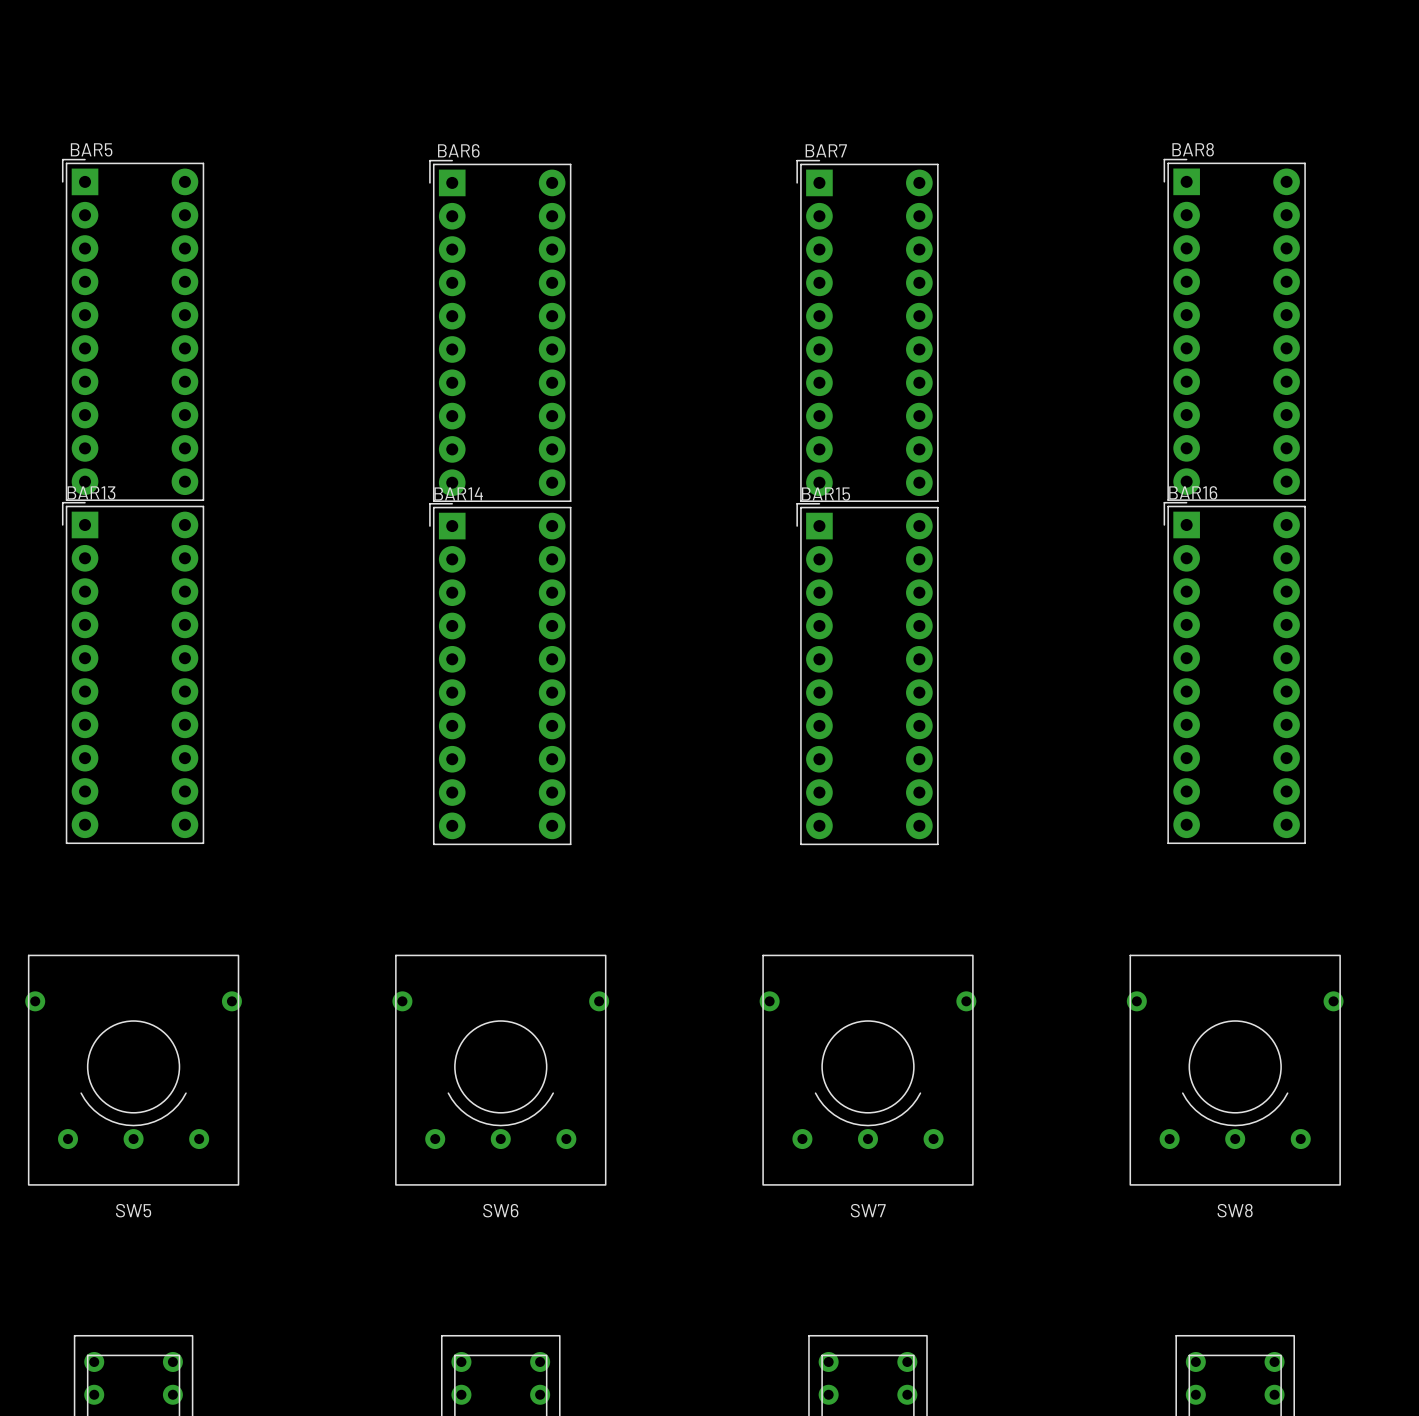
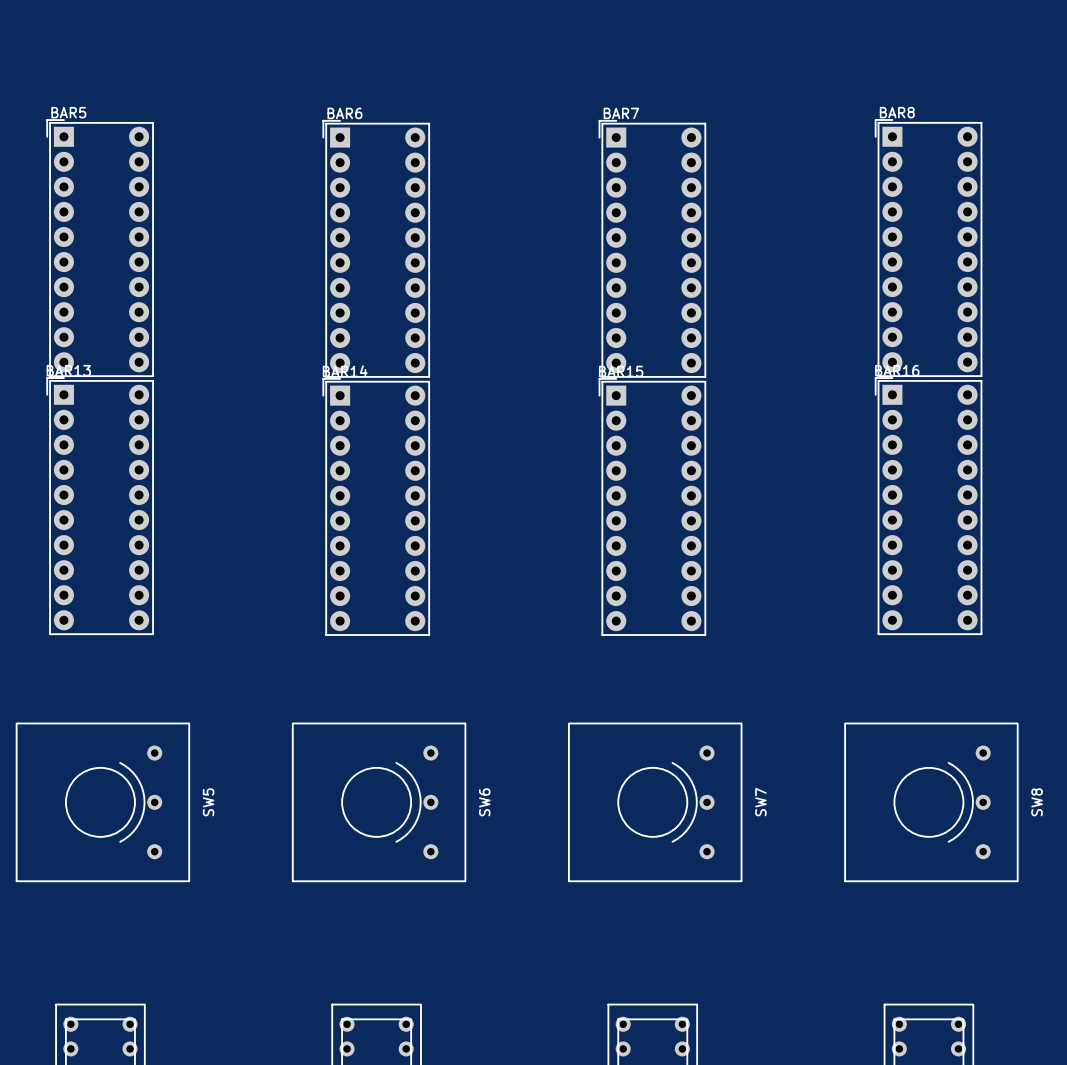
SW5 footprint: [25, 954, 242, 1186] -> [16, 722, 190, 882]
SW6 footprint: [392, 954, 610, 1186] -> [292, 722, 466, 882]
SW7 footprint: [759, 954, 977, 1186] -> [568, 722, 743, 882]
SW8 footprint: [1126, 954, 1344, 1186] -> [844, 722, 1019, 882]
SW5 name position: SW5 (133, 1210) -> SW5 (208, 802)
SW6 name position: SW6 (500, 1210) -> SW6 (484, 802)
SW7 name position: SW7 (868, 1210) -> SW7 (760, 802)
SW8 name position: SW8 (1235, 1210) -> SW8 (1037, 802)

